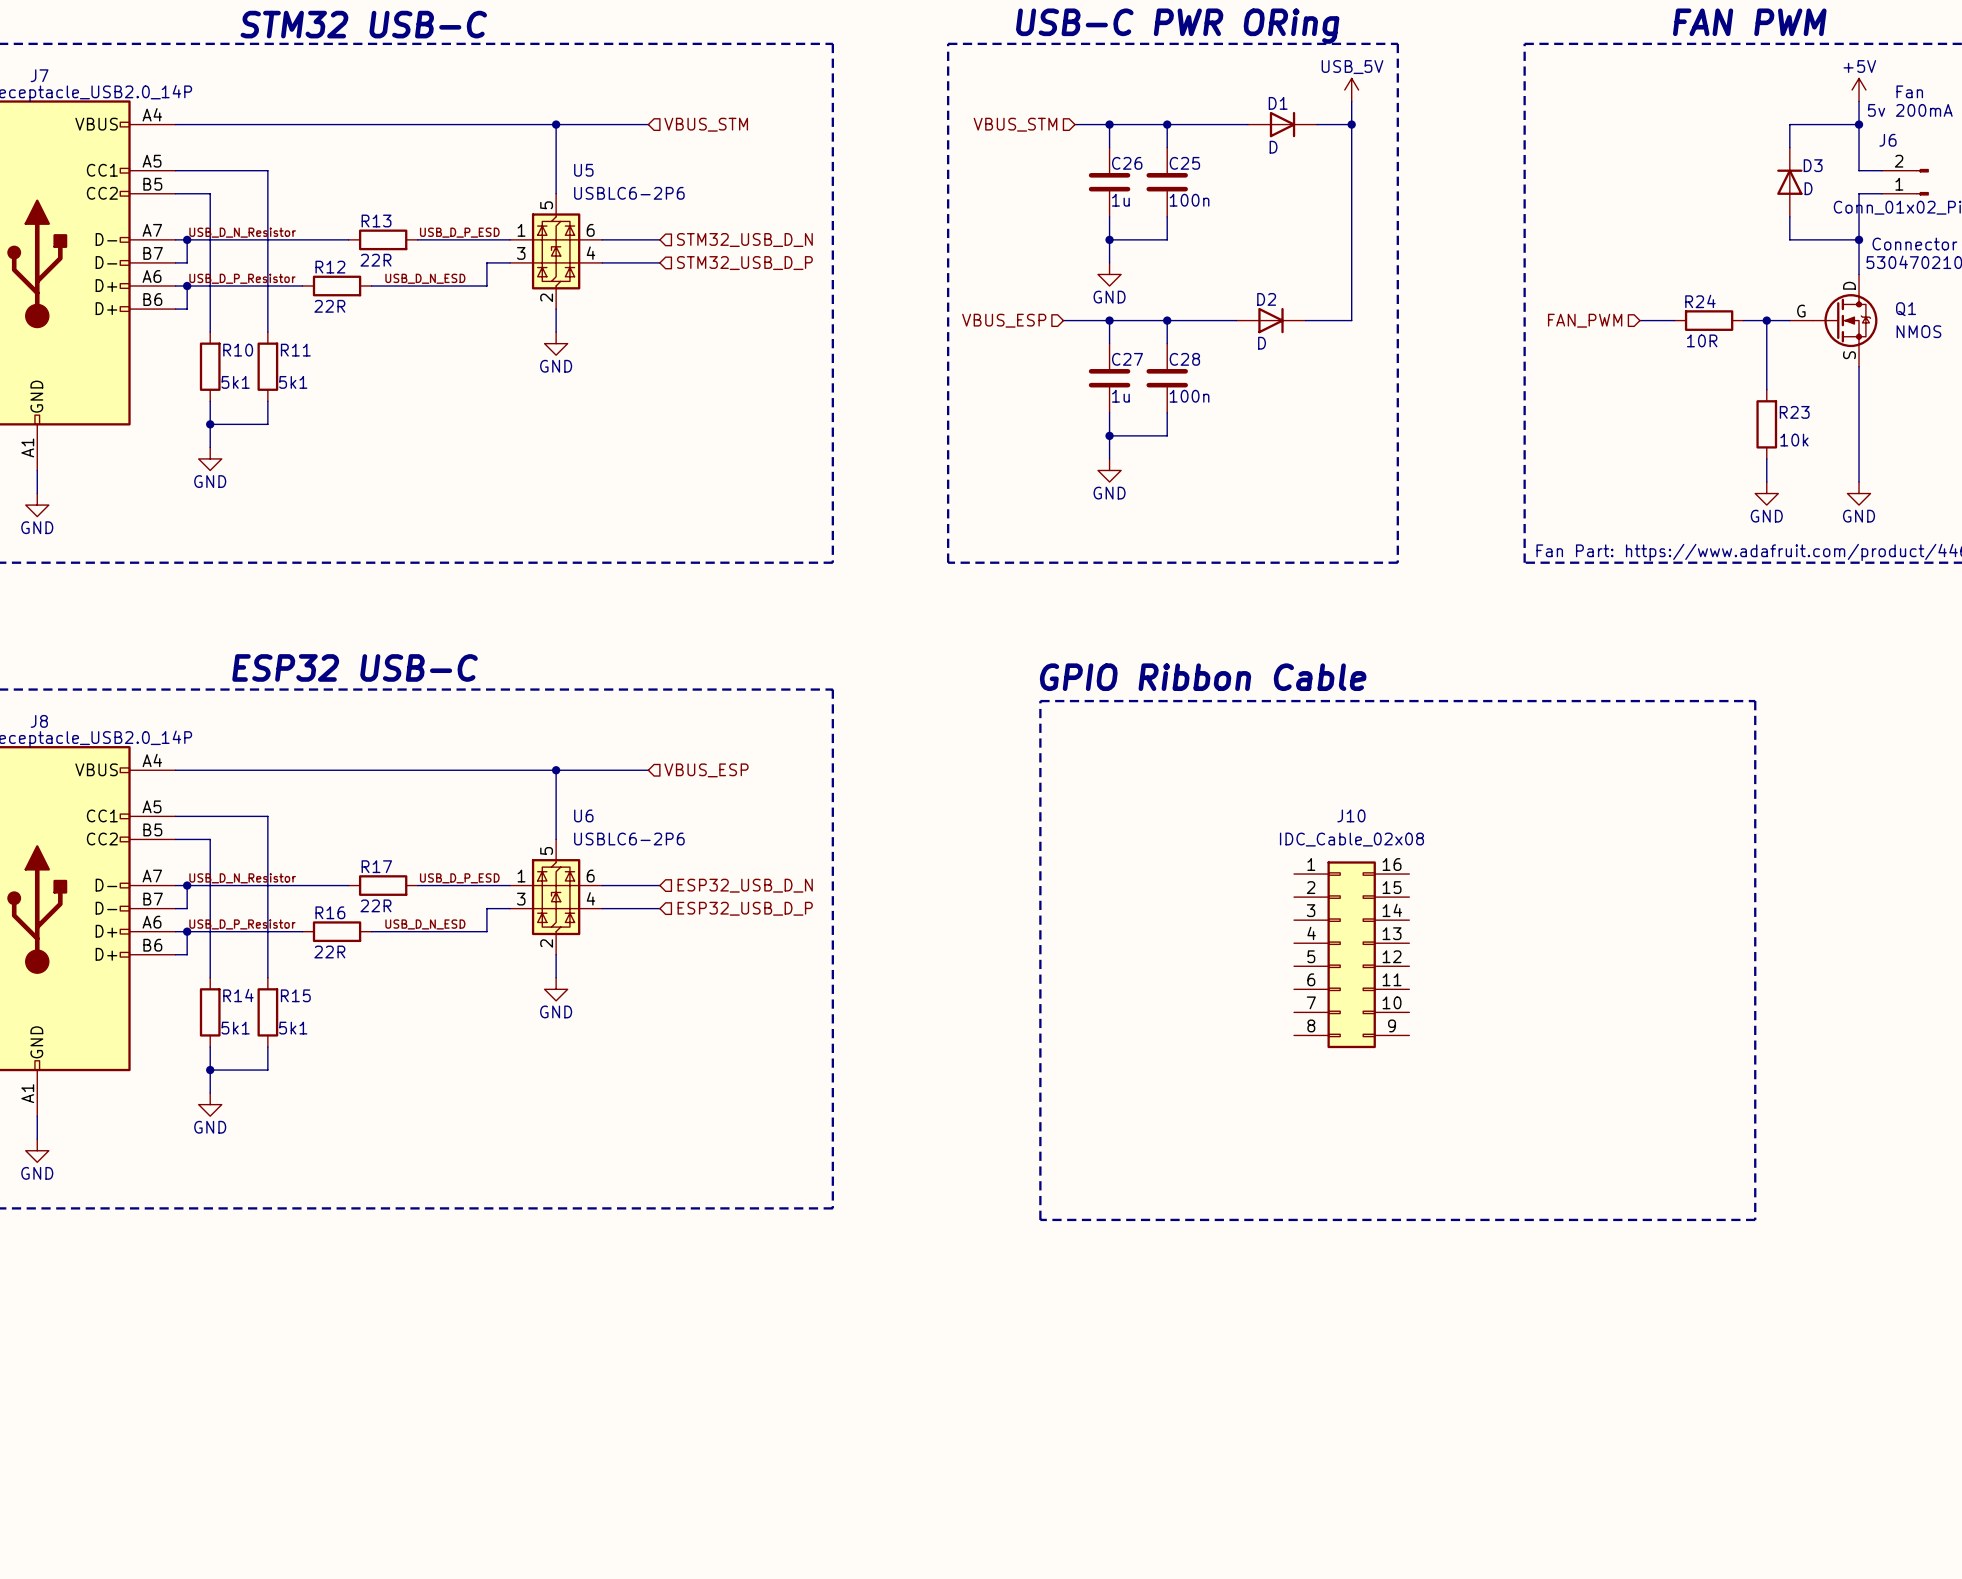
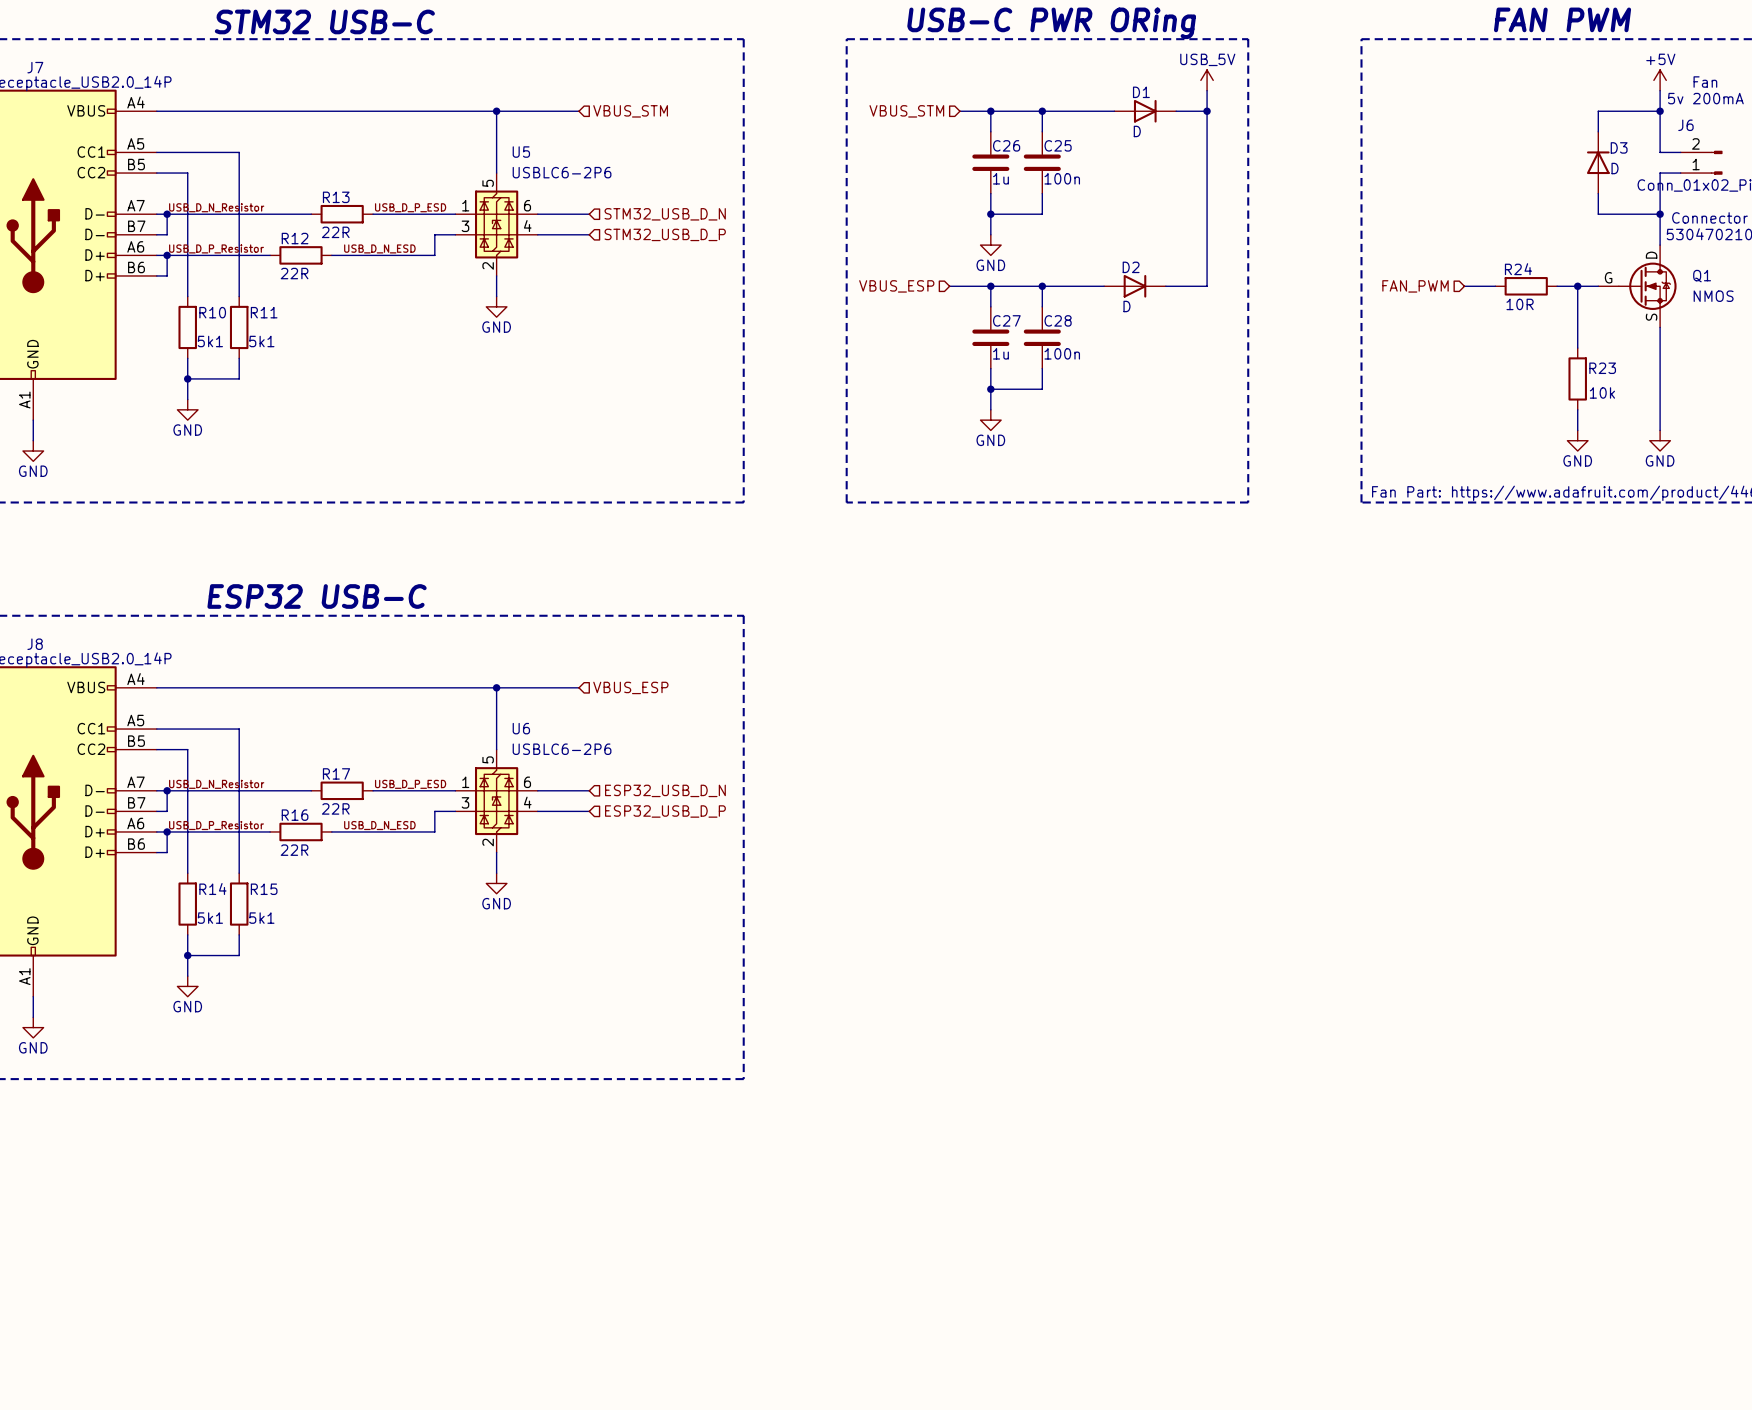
text: GPIO Ribbon Cable (1203, 677) -> none
line: (1040, 701) (1755, 701) (1755, 1219) (1040, 1219) (1040, 701) -> none
J10: IDC_Cable_02x08 (1351, 954) -> none

